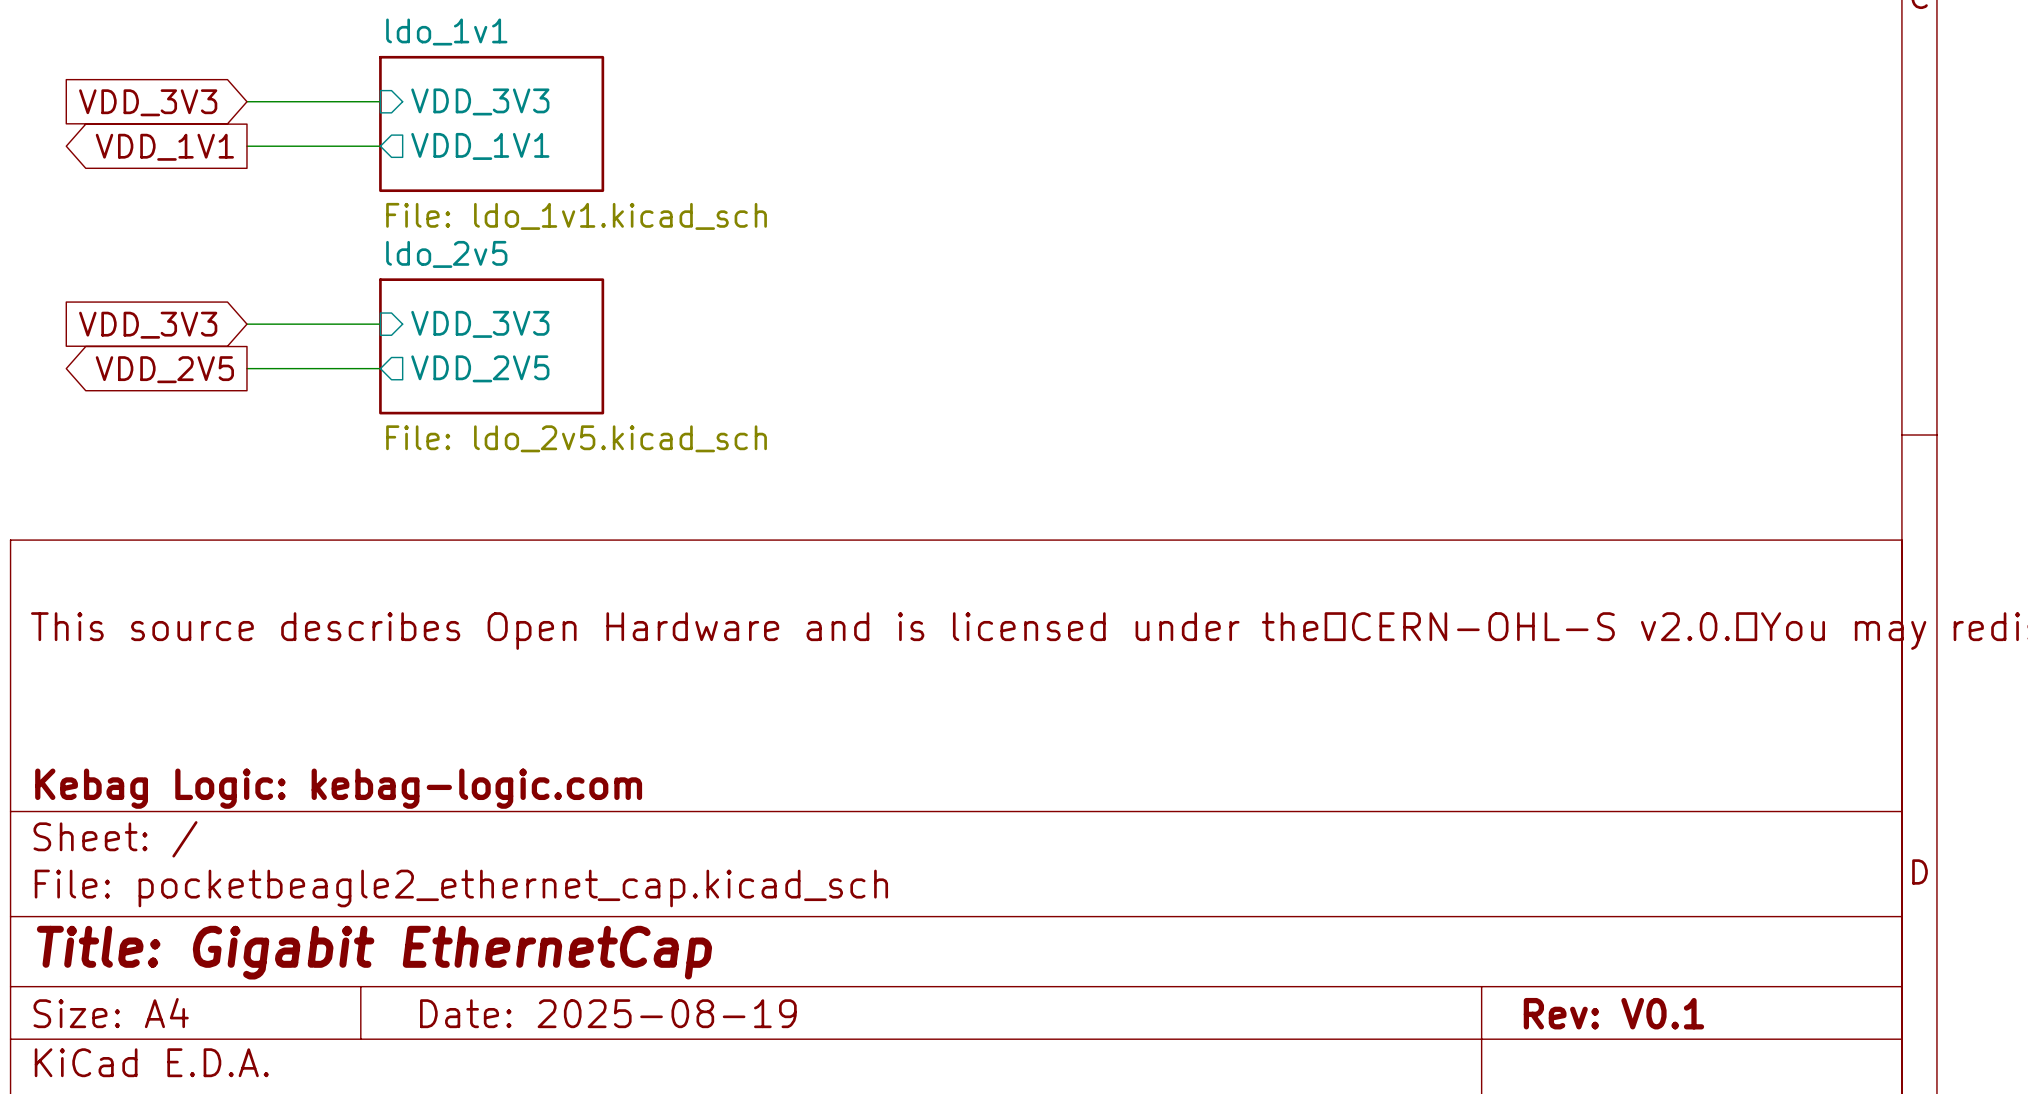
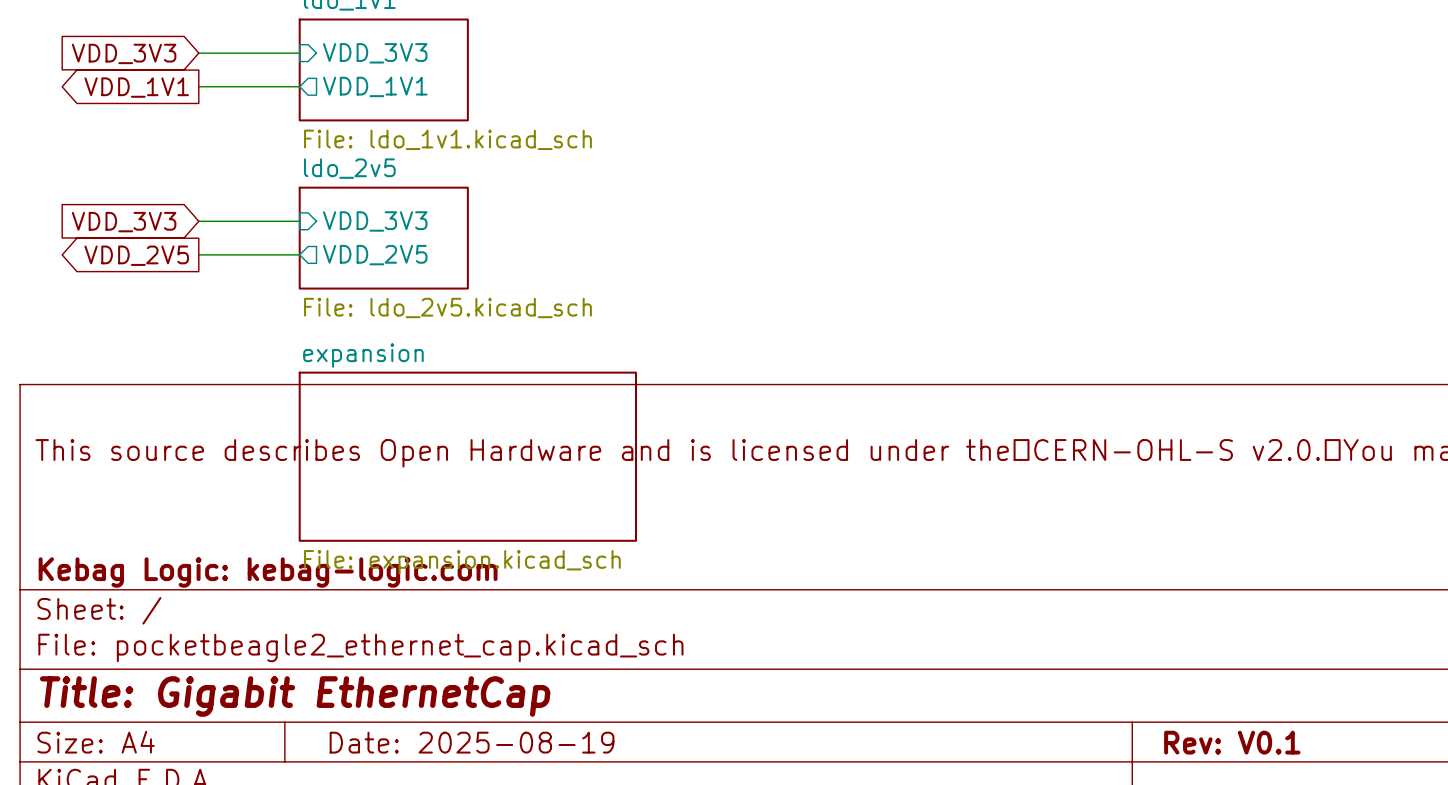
sheet expansion: none -> File: expansion.kicad_sch (467, 456)

